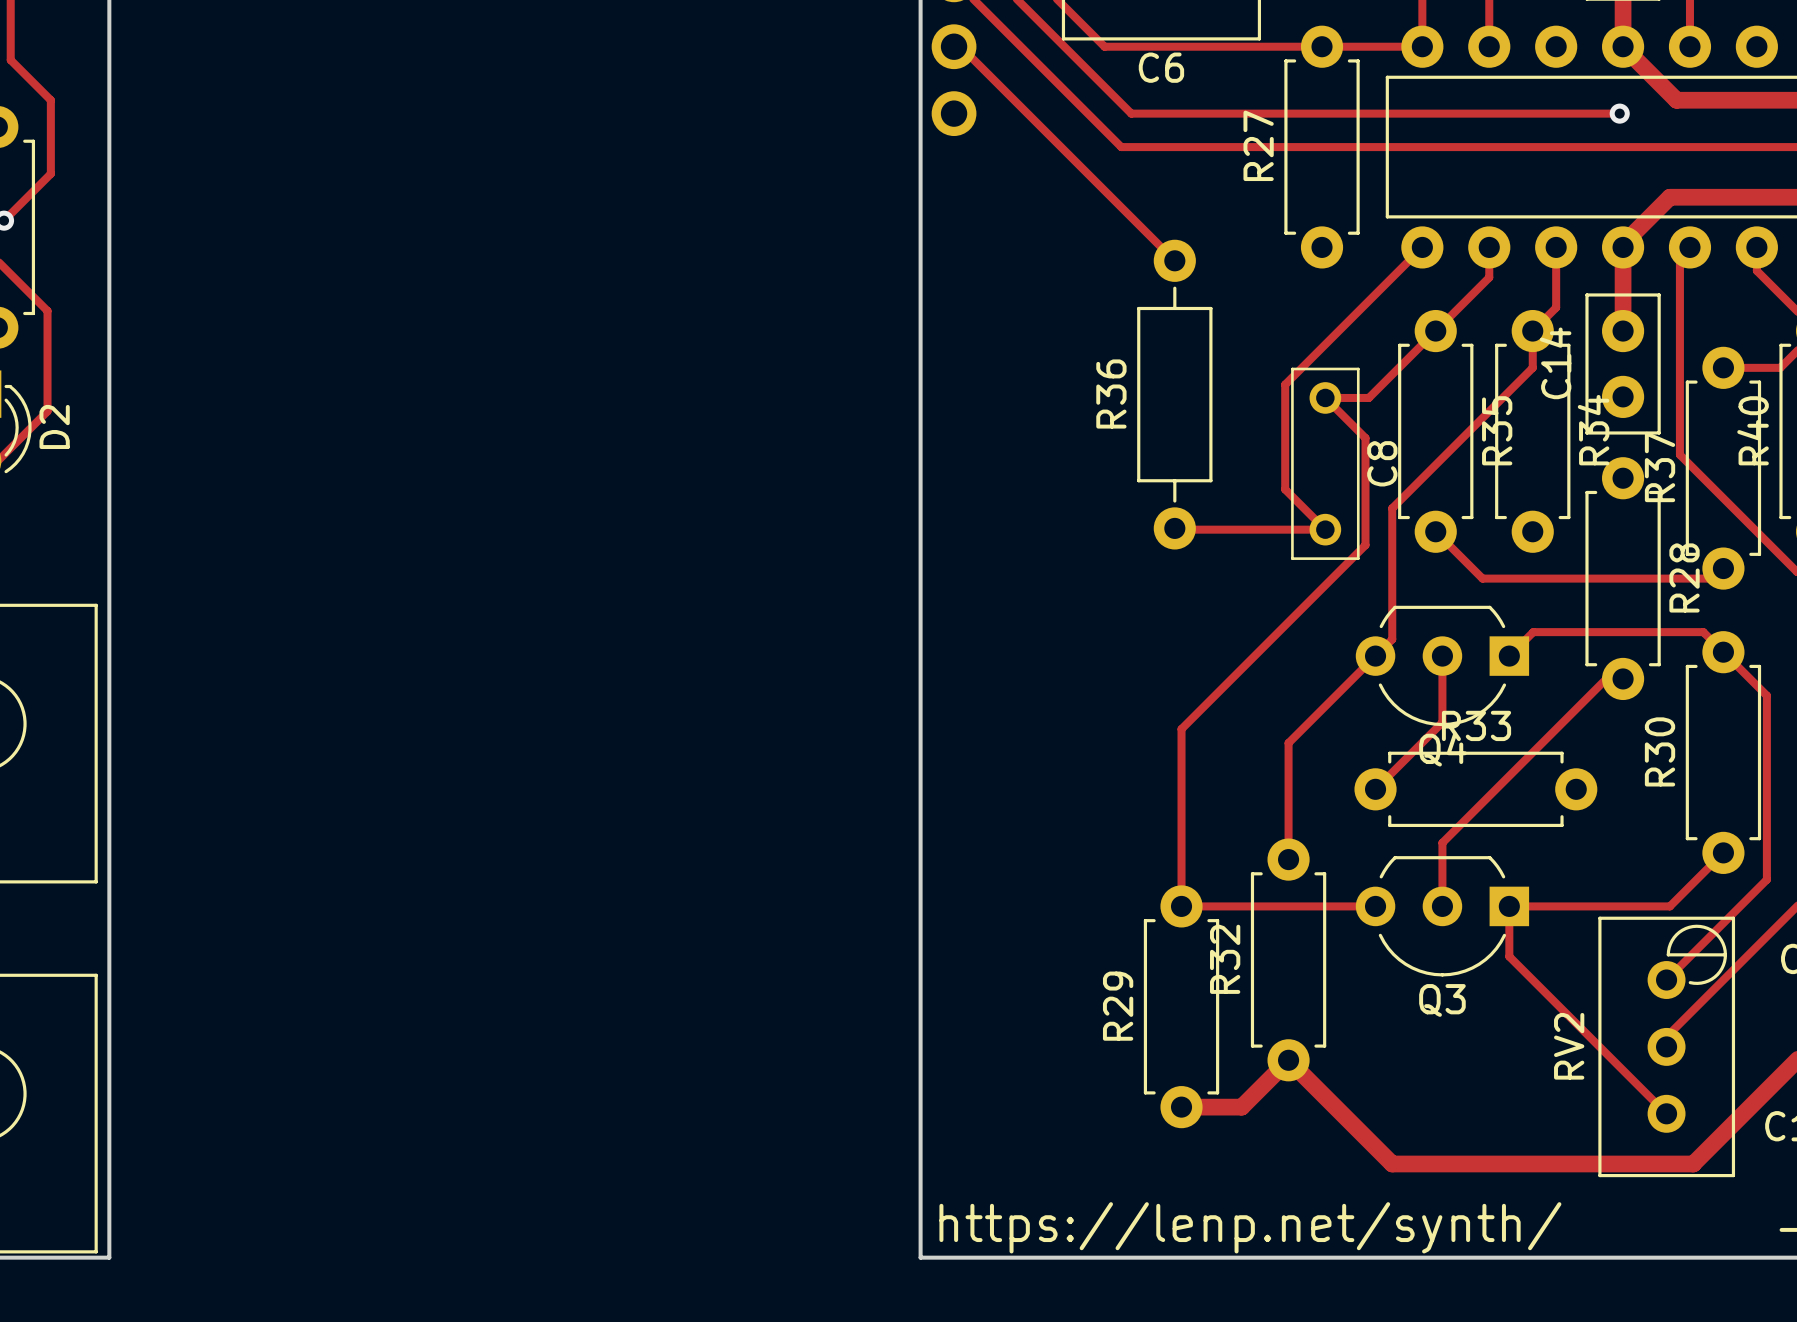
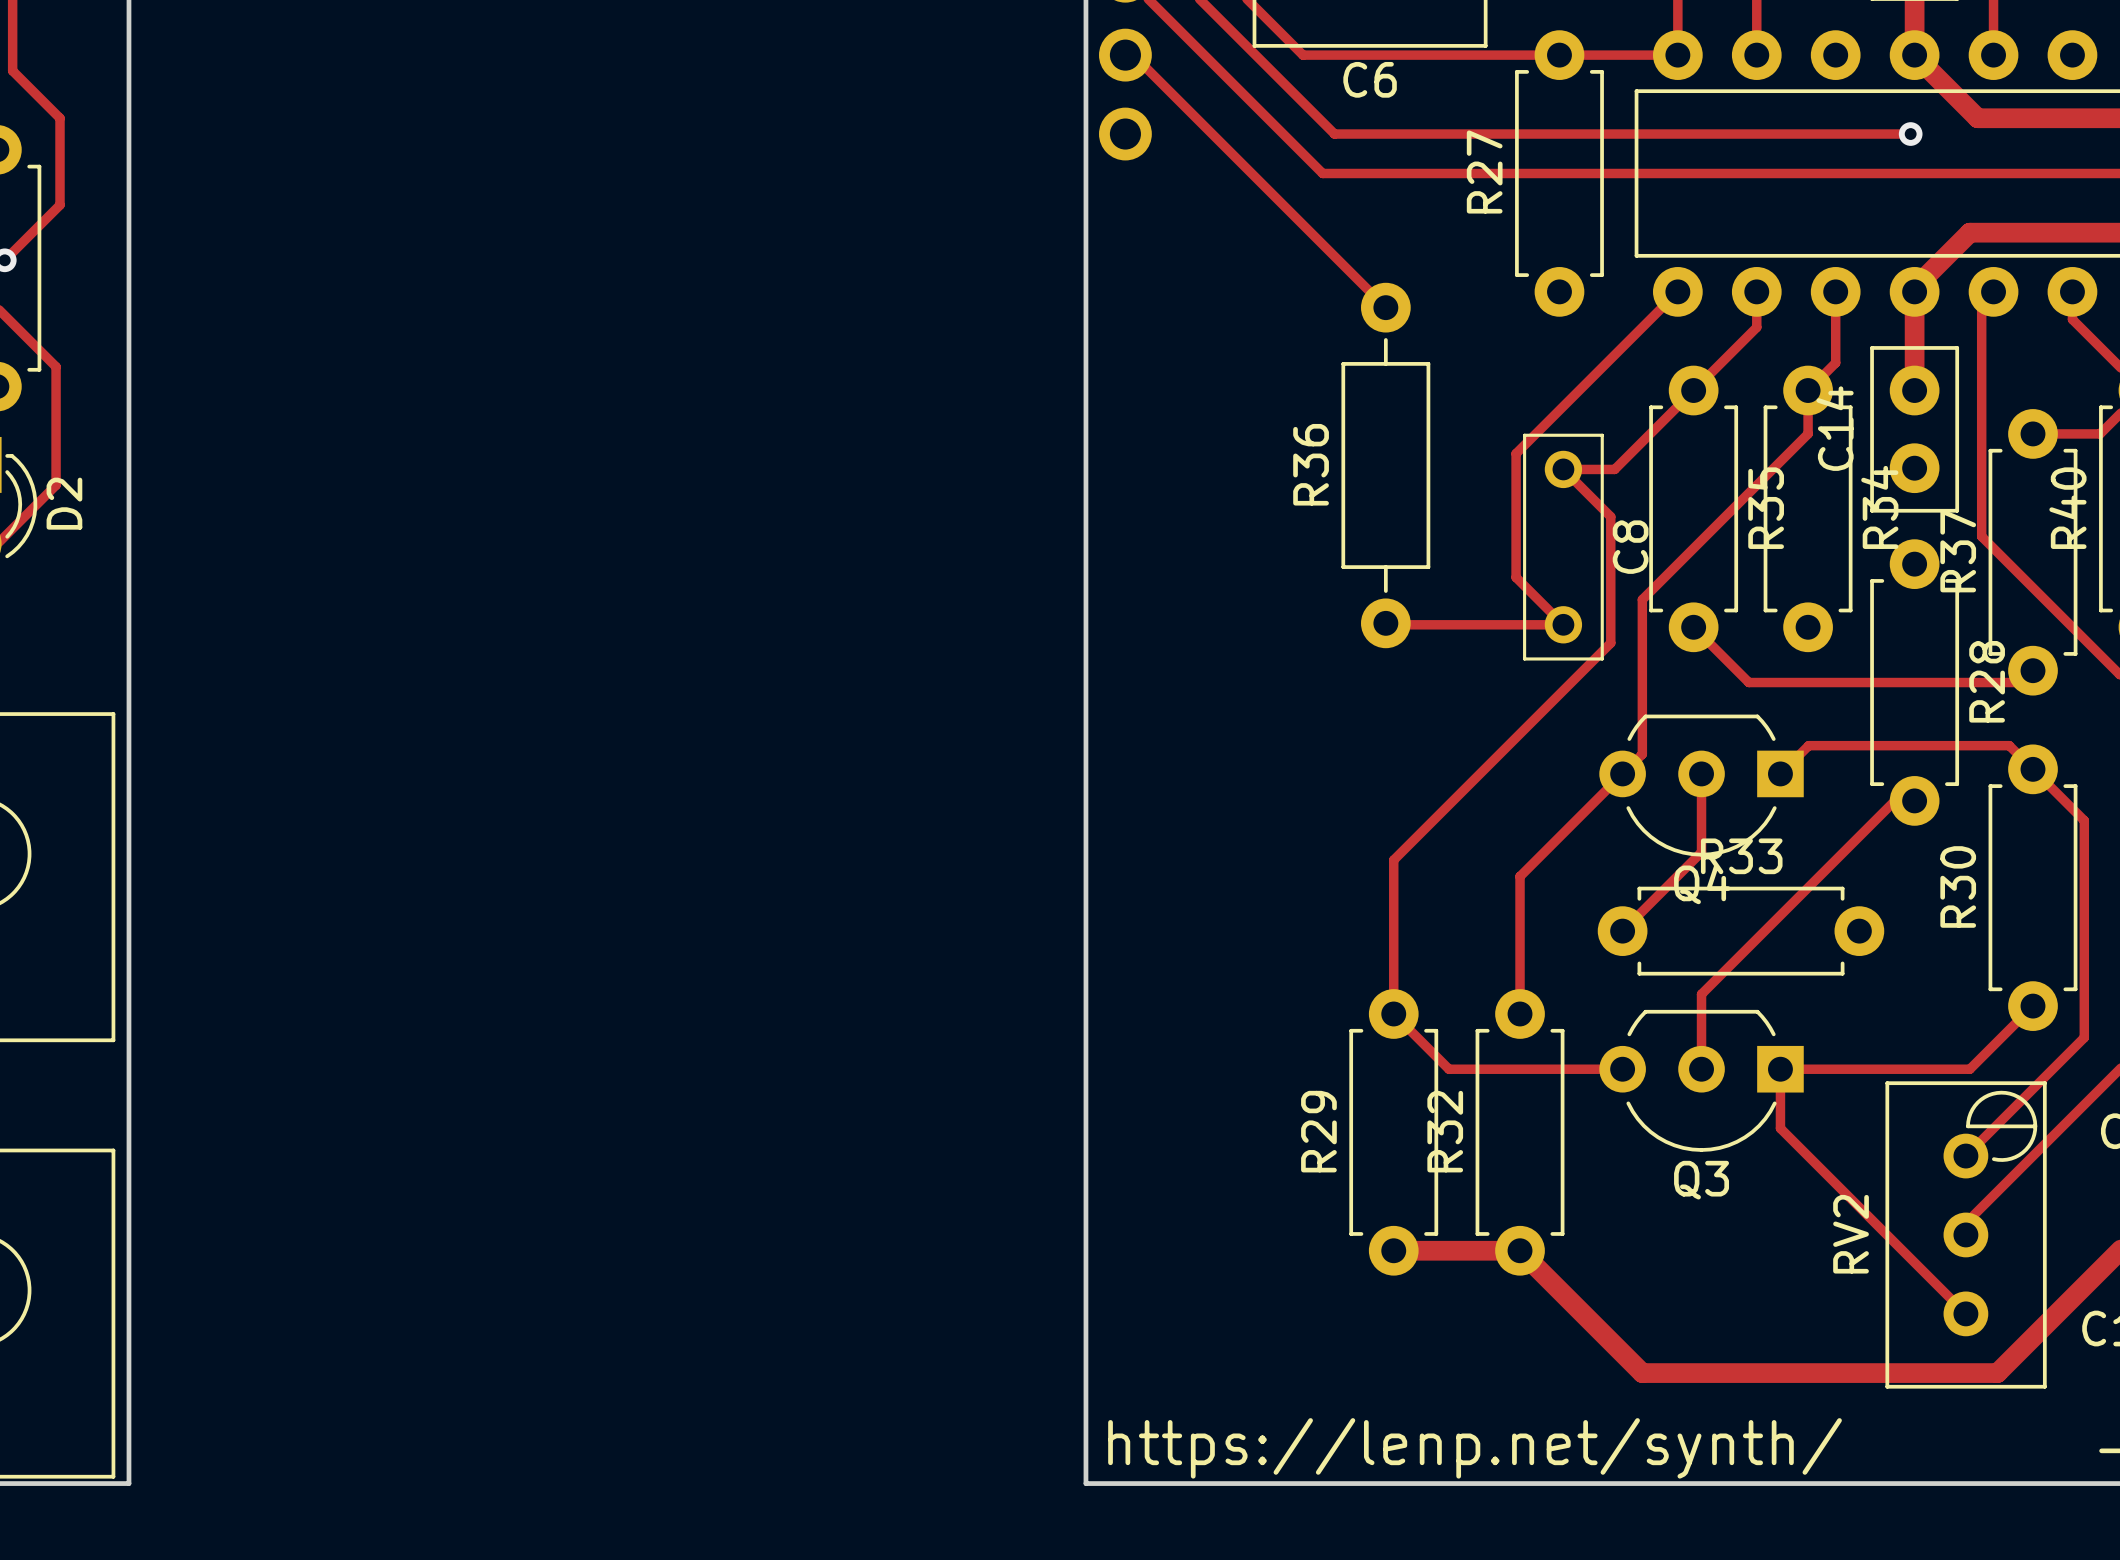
track: (1181, 859) (1181, 906) (1228, 906) -> (1393, 1013) (1448, 1069)
R29 position: (1181, 1006) -> (1393, 1132)
track: (1288, 1060) (1241, 1107) (1181, 1107) -> (1520, 1250) (1393, 1250)

